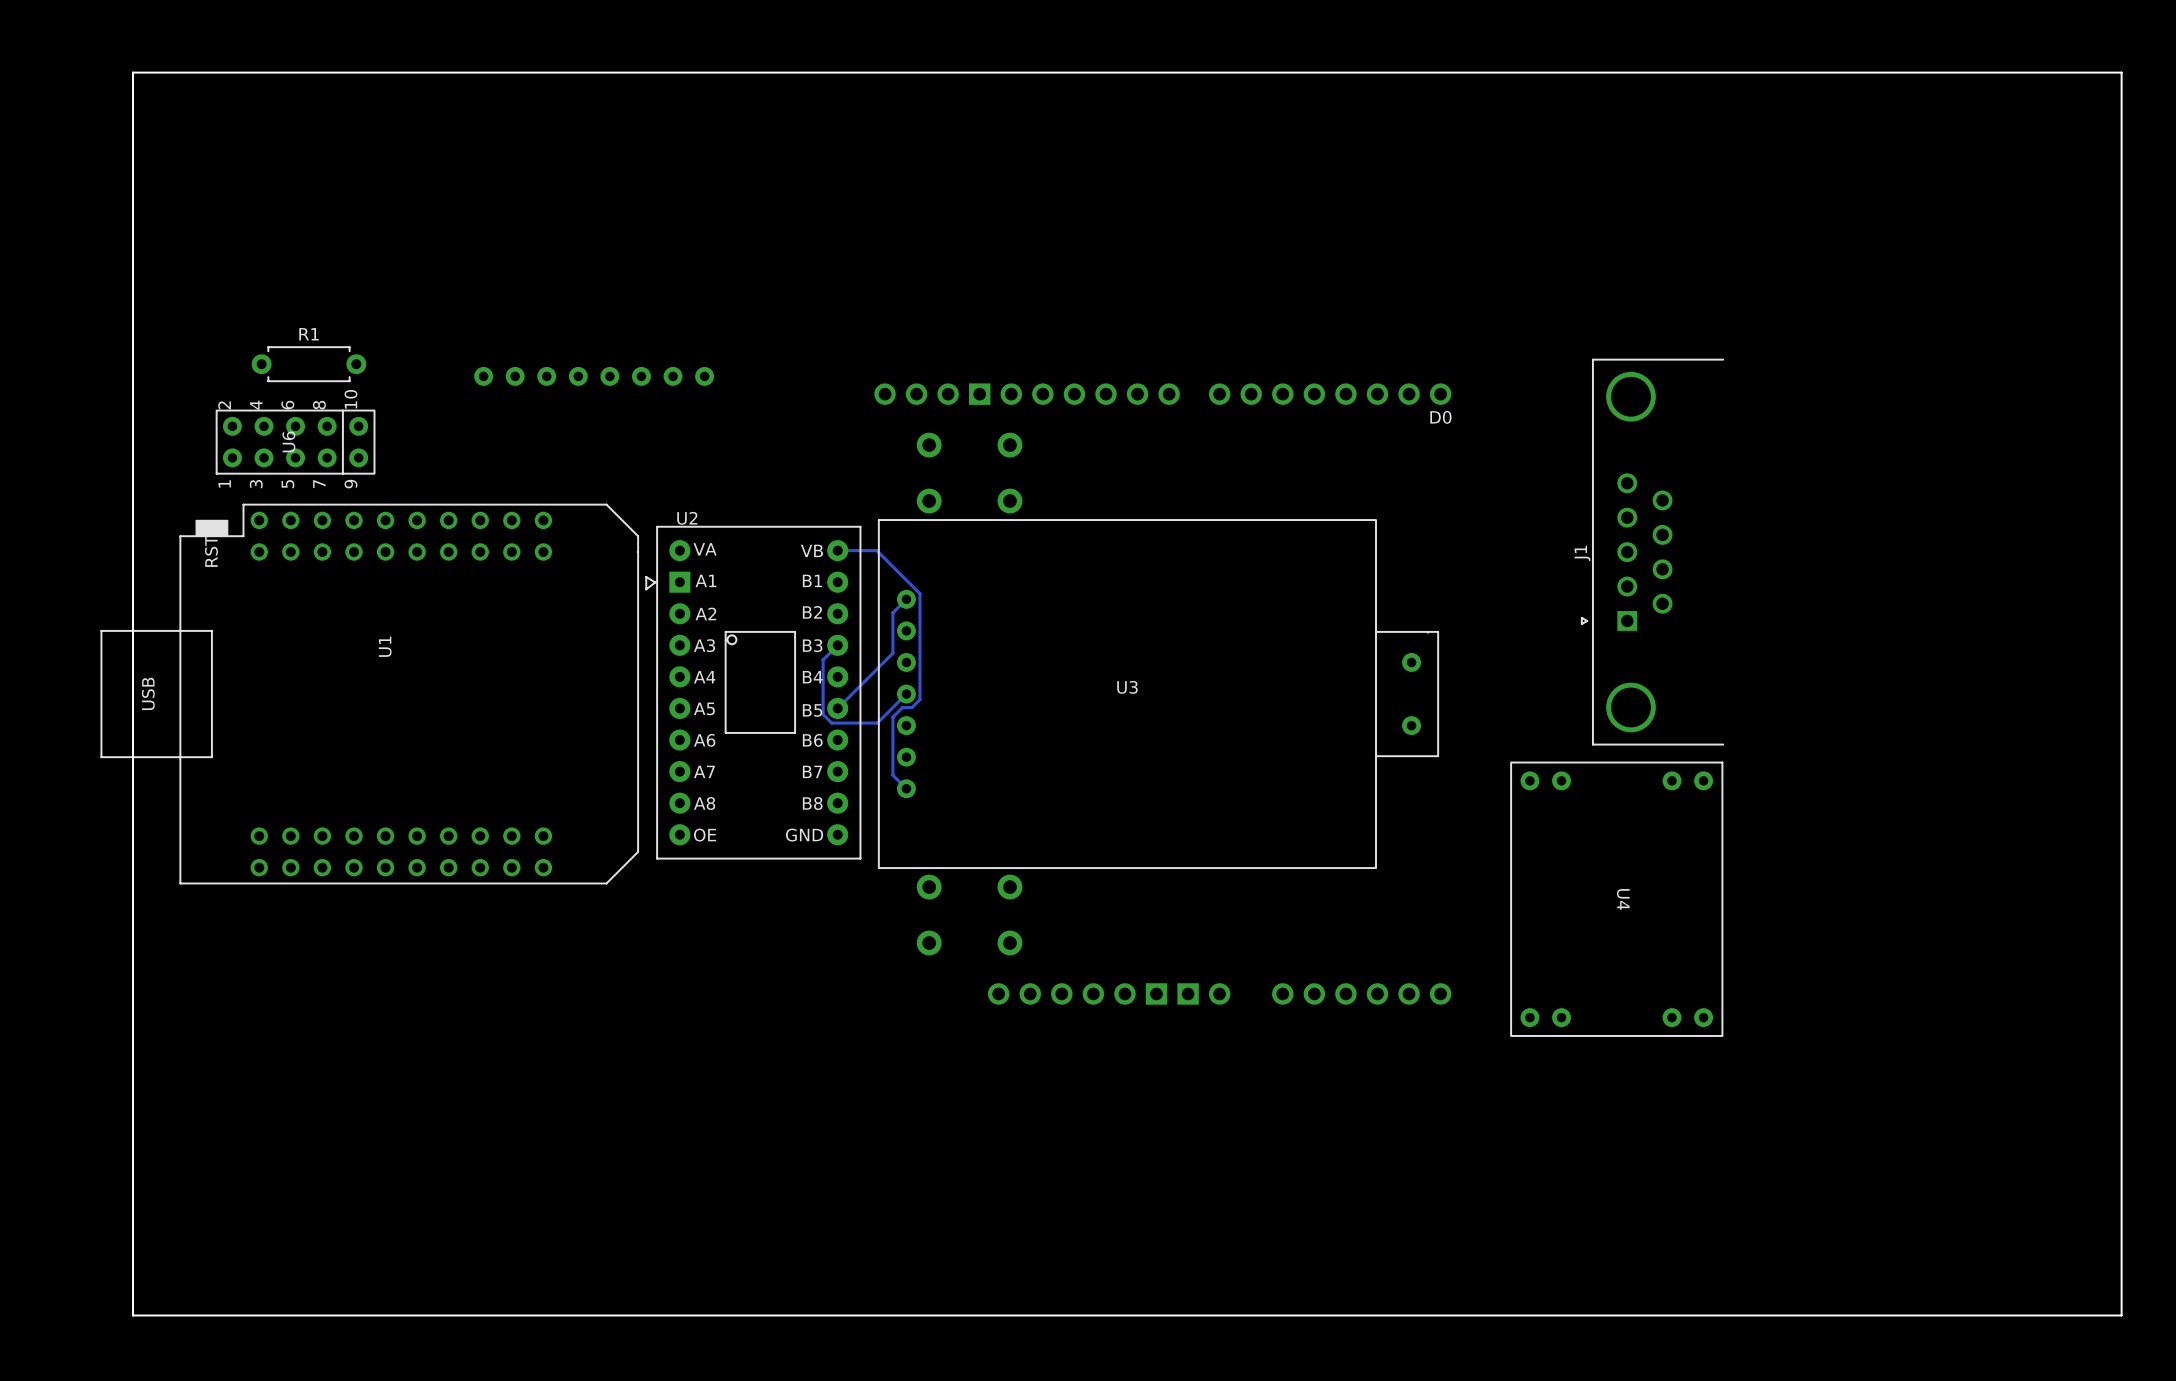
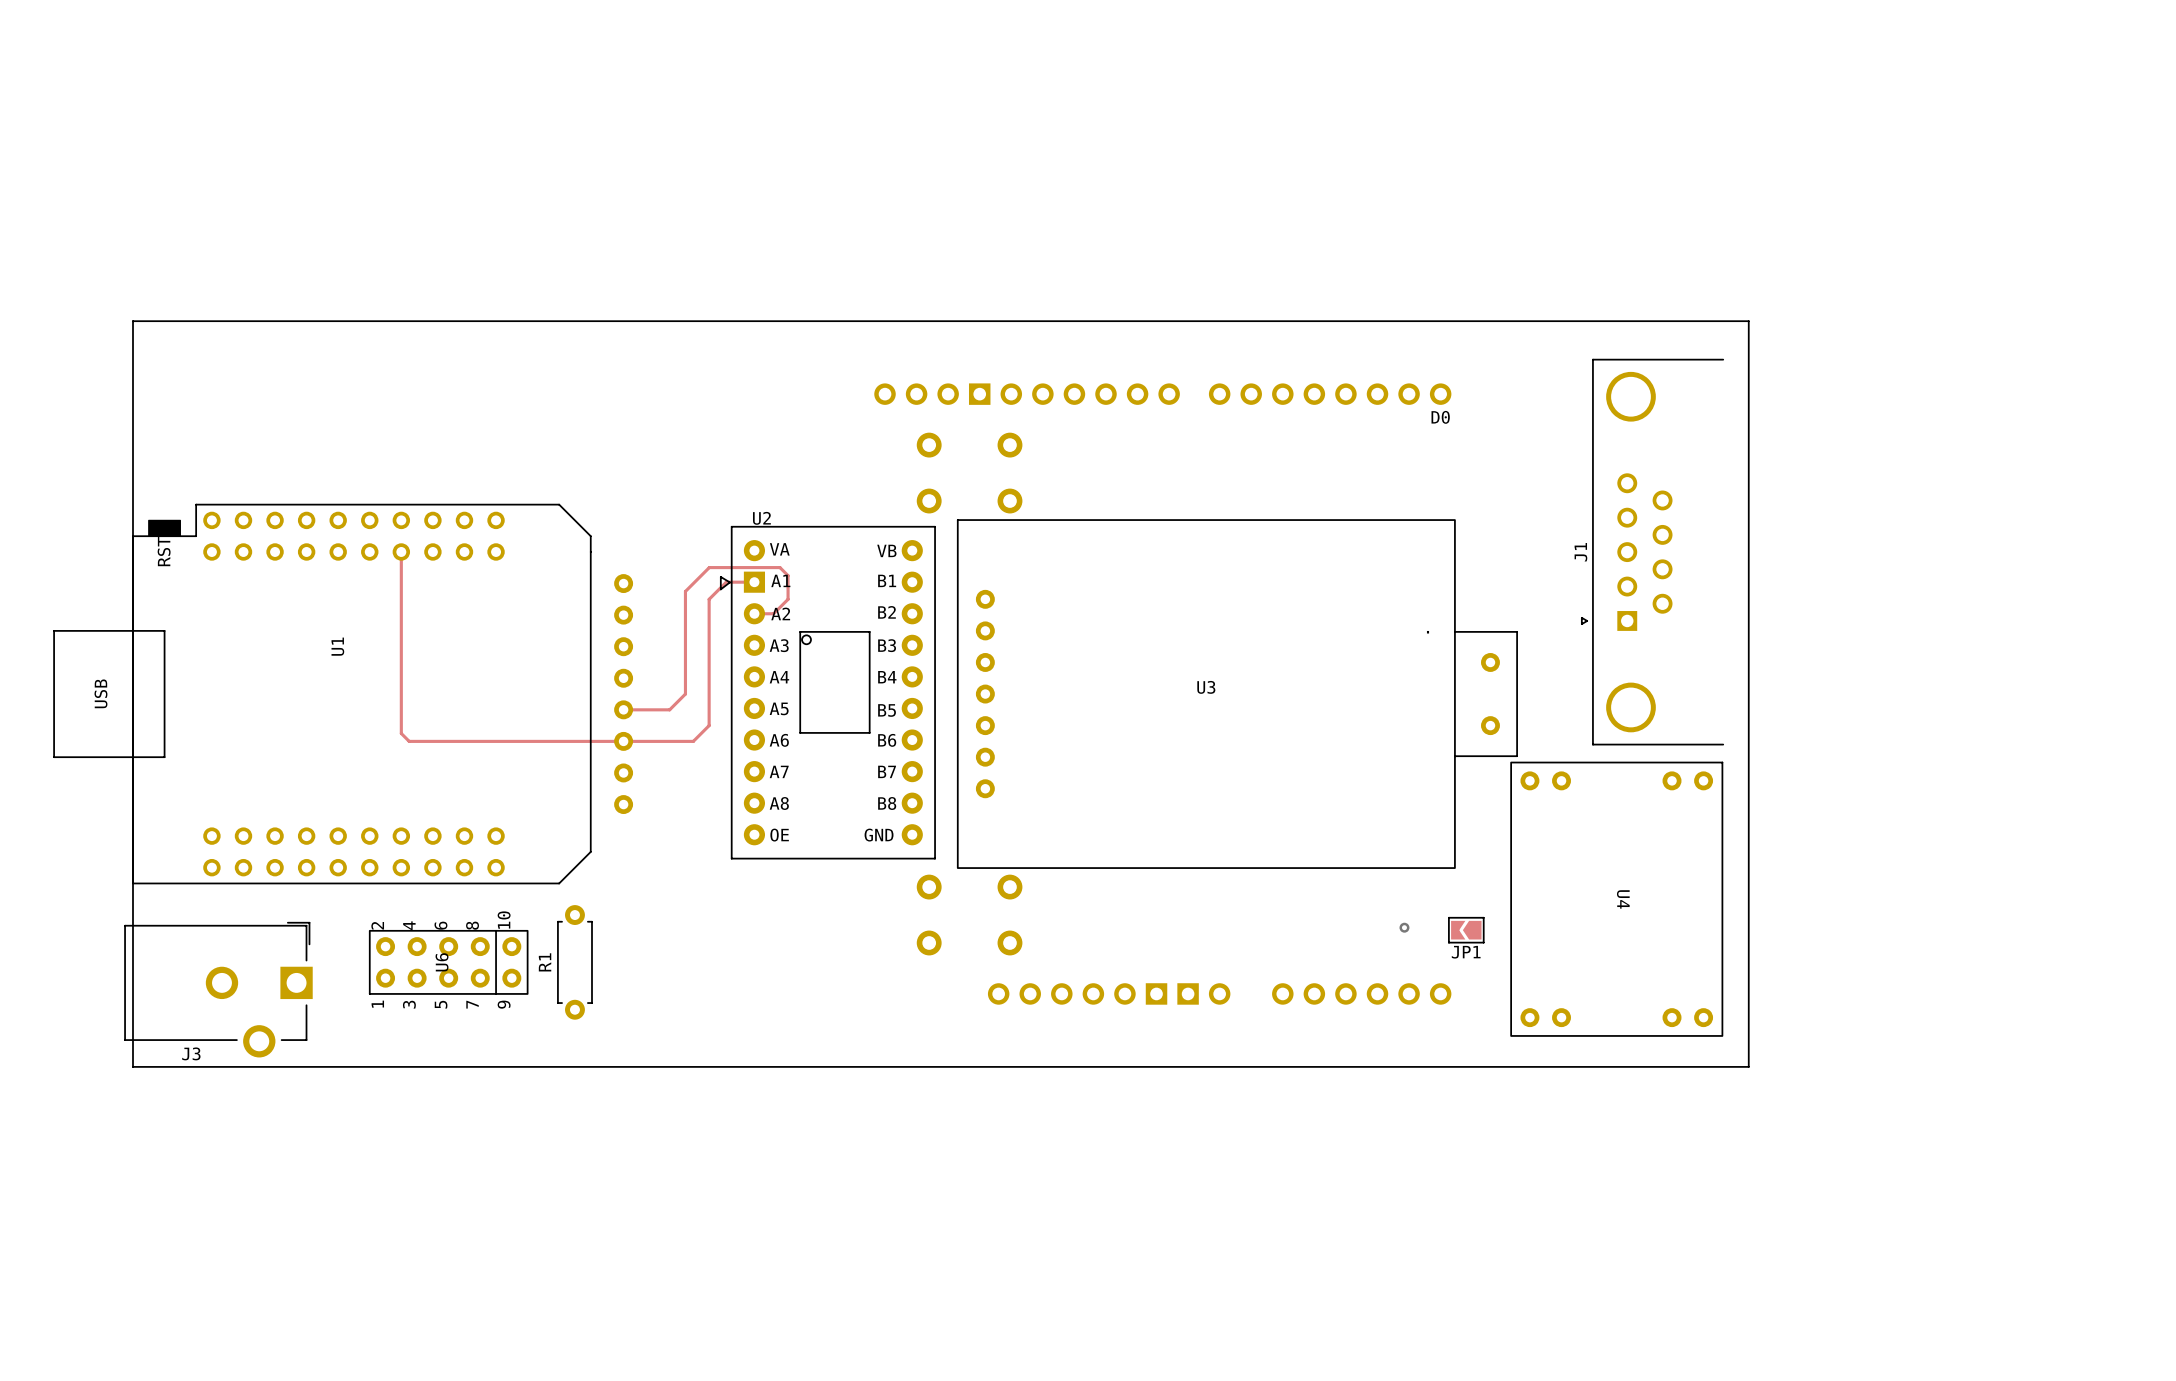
board edge: (132, 321) (132, 72) (2121, 72) (2121, 1315) (132, 1315) (132, 1066) -> (132, 321) (1748, 321) (1748, 1066) (132, 1066)
R1 name position: R1 (309, 334) -> R1 (545, 962)
R1 rotation: 0° (308, 364) -> 90° clockwise (574, 962)
R1 position: (308, 364) -> (574, 962)
part: (594, 376) -> none
U6 position: (295, 442) -> (448, 962)
bottom track: (837, 550) (876, 550) (919, 593) (919, 699) (912, 707) (902, 707) (892, 717) (892, 775) (906, 788) -> none
top track: none -> (401, 551) (401, 733) (409, 741) (693, 741) (709, 725) (709, 599) (726, 582) (754, 582)
bottom track: (906, 599) (892, 612) (892, 653) (837, 708) -> none
top track: none -> (754, 613) (773, 613) (788, 599) (788, 575) (779, 567) (709, 567) (685, 591) (685, 694) (669, 709) (623, 709)
bottom track: (837, 645) (823, 659) (823, 714) (831, 723) (877, 723) (906, 694) -> none
U2 position: (753, 692) -> (827, 692)
U1 position: (369, 694) -> (322, 694)
part: none -> (623, 694)
U3 position: (1158, 694) -> (1237, 694)
via: none -> (1404, 927)
JP1: none -> (1466, 930)
J3: none -> (218, 989)

